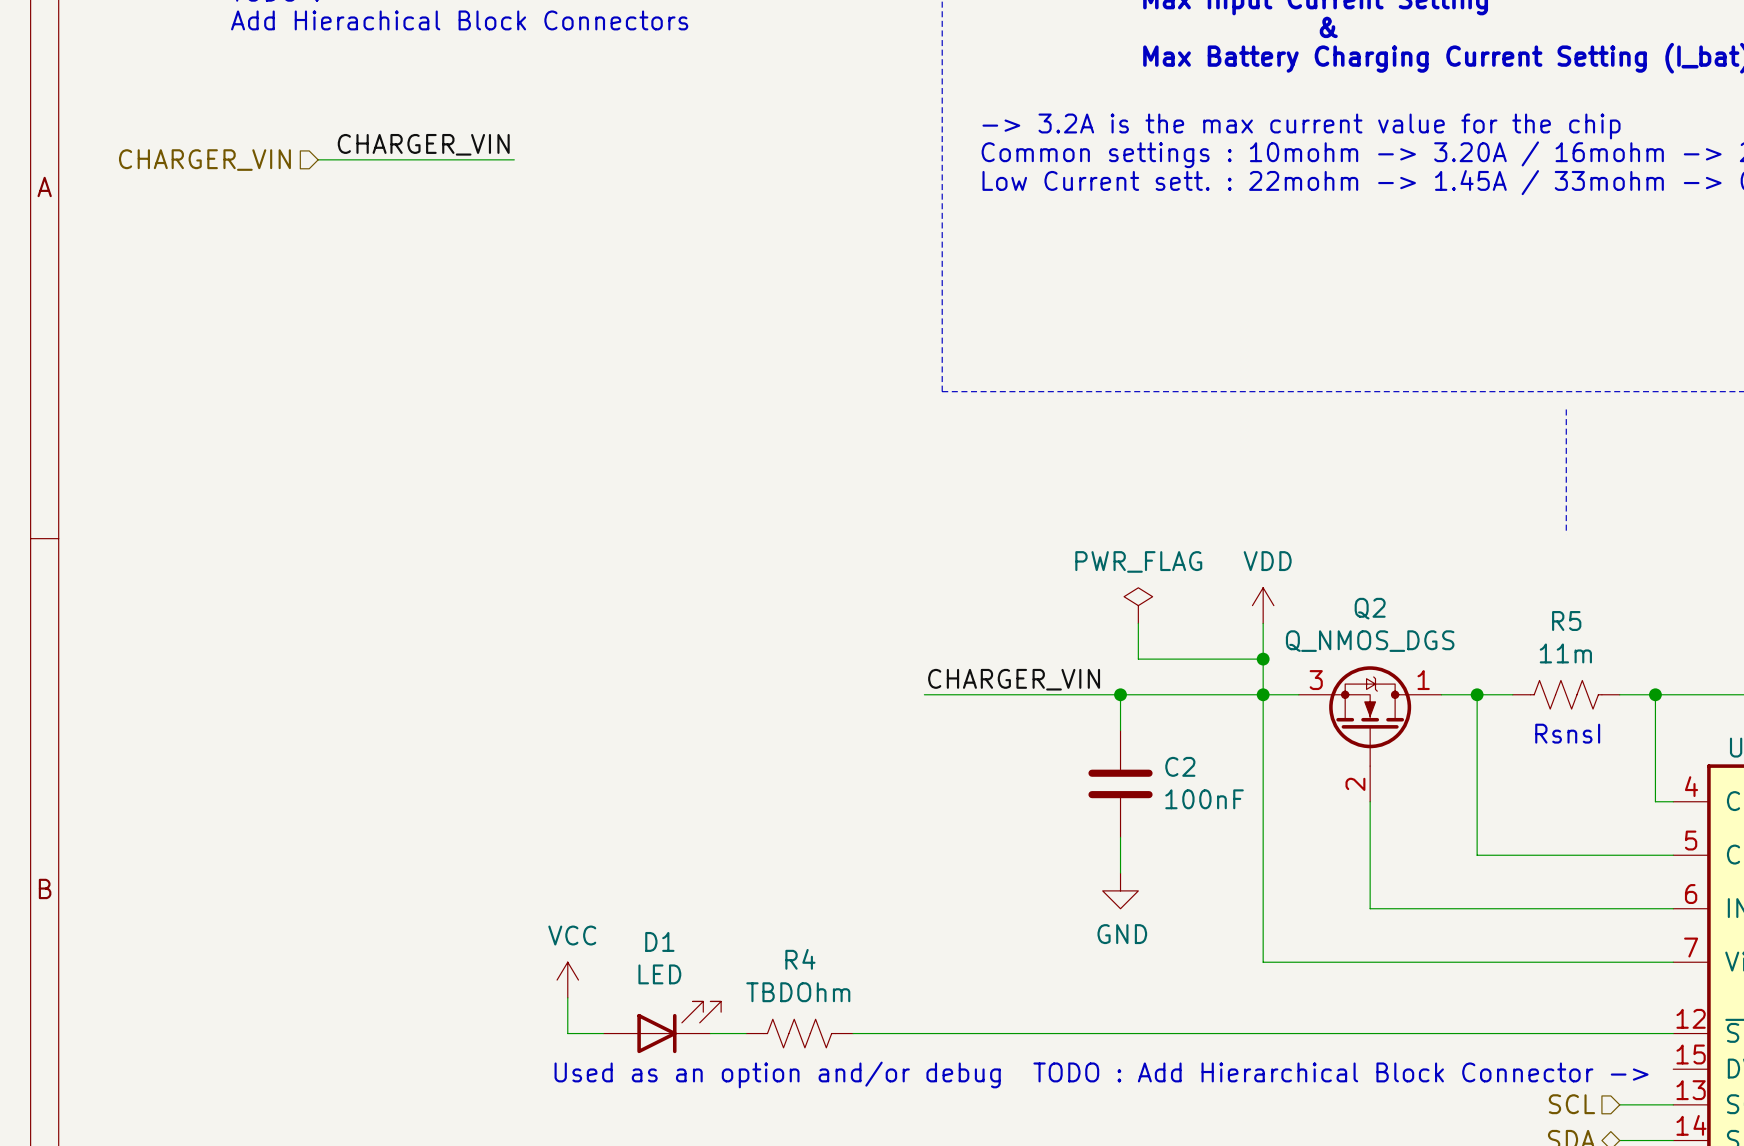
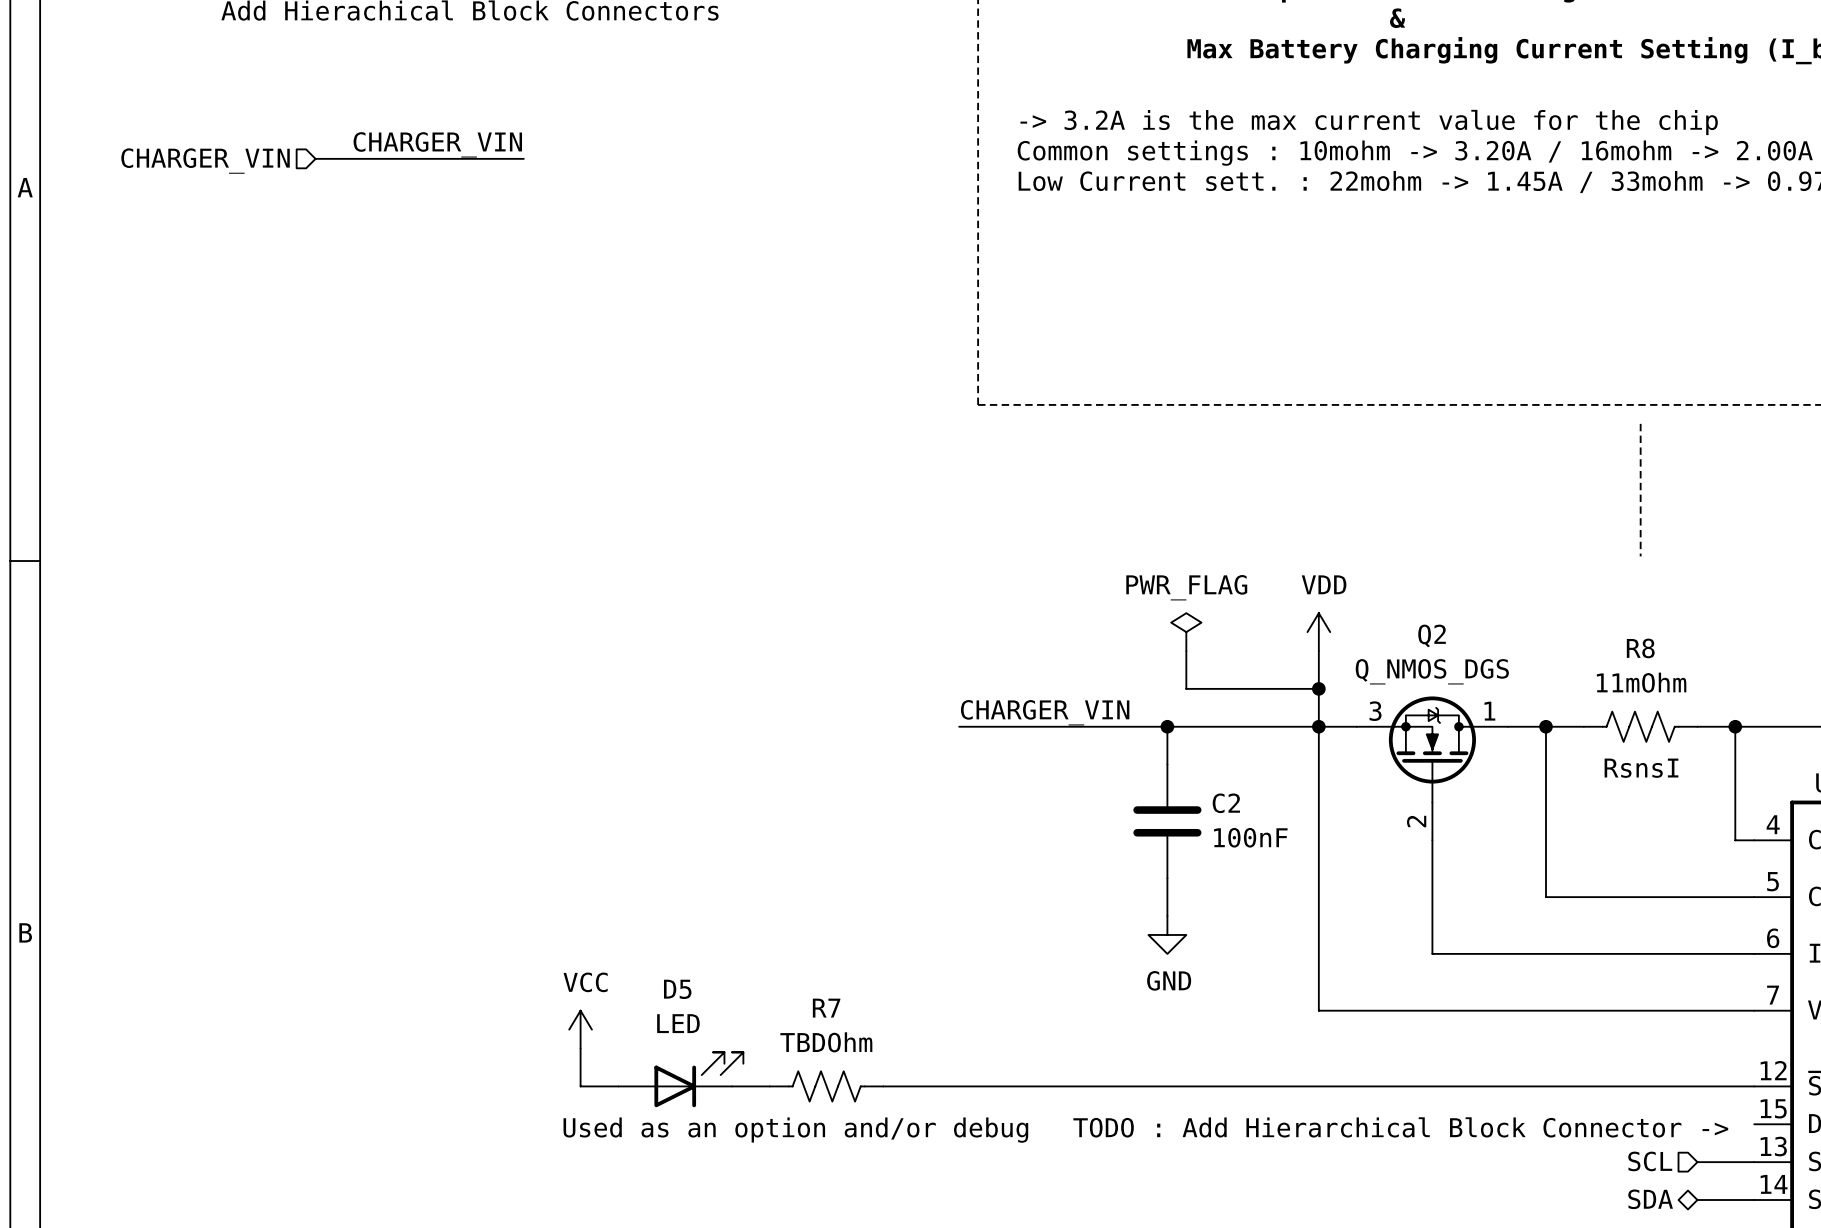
R5 name: R5 (1566, 621) -> R8 (1640, 648)
R5 value: 11m (1565, 653) -> 11mOhm (1641, 682)
D1 name: D1 (659, 941) -> D5 (677, 989)
R4 name: R4 (800, 959) -> R7 (826, 1008)

